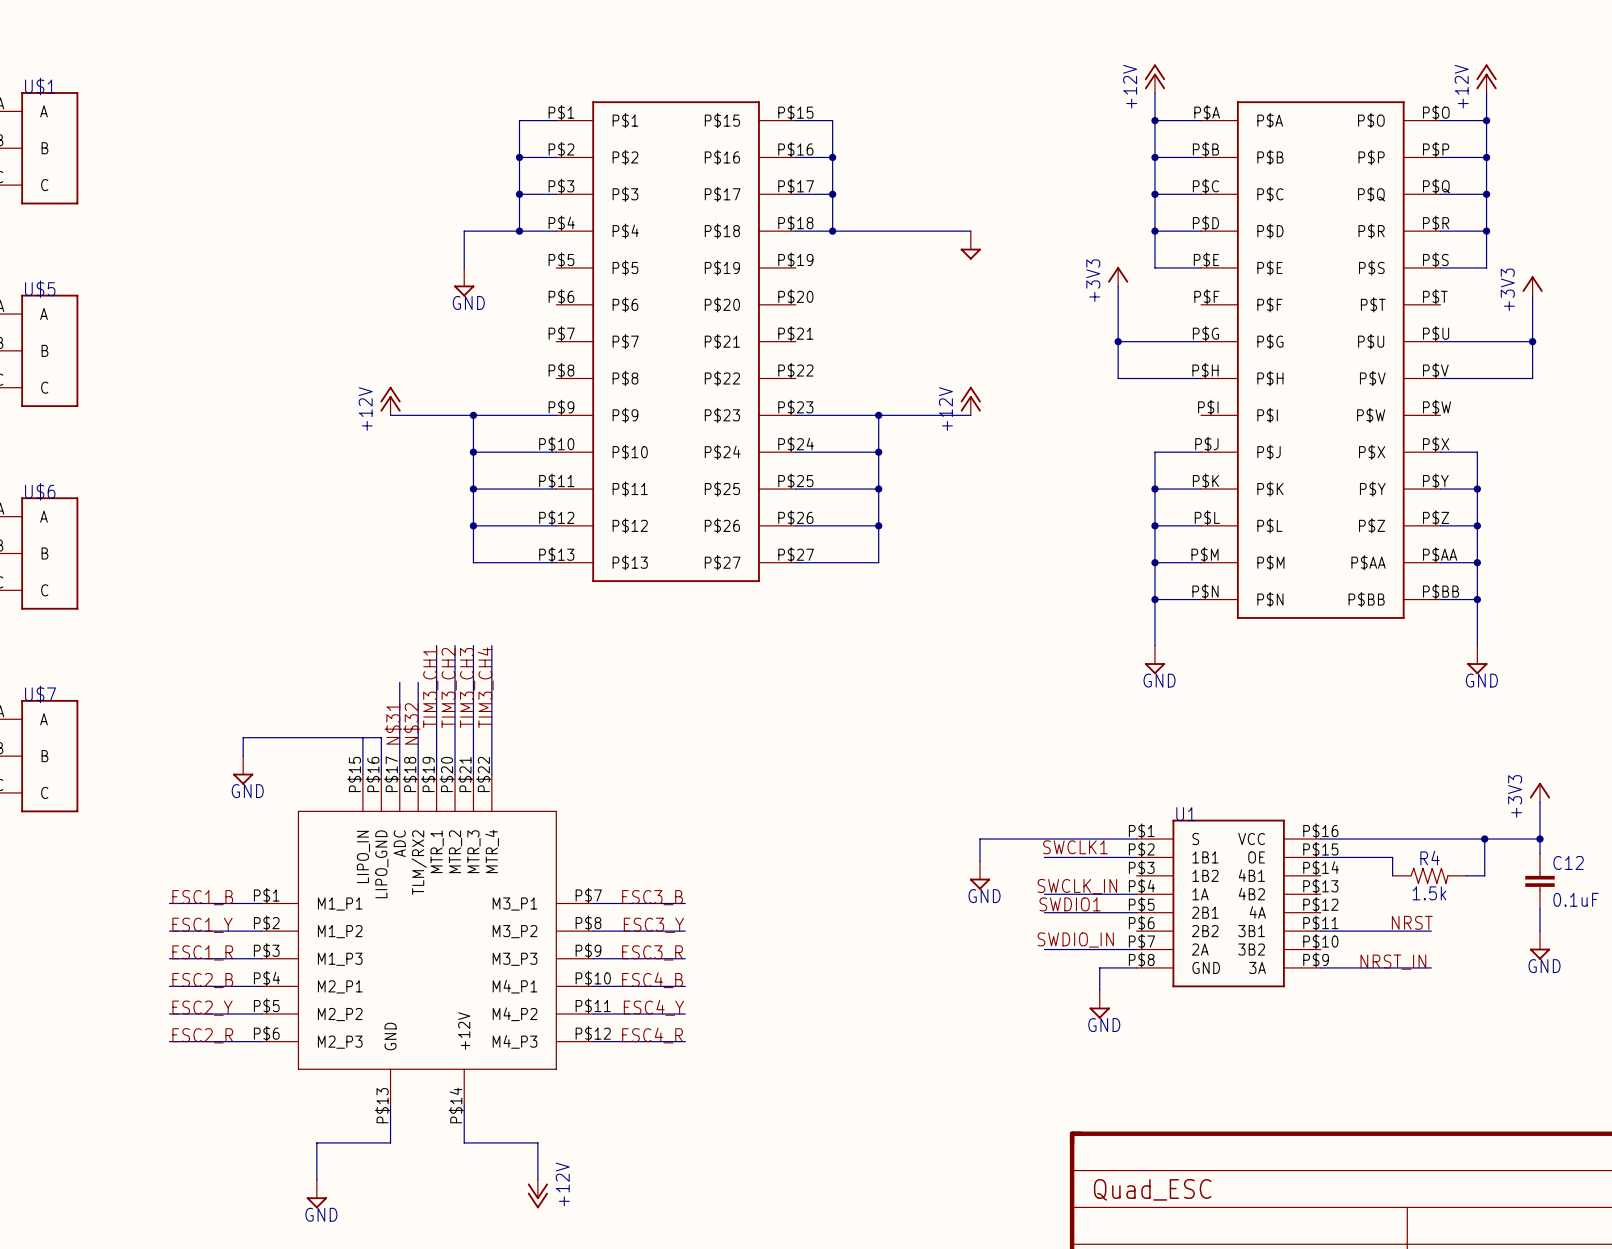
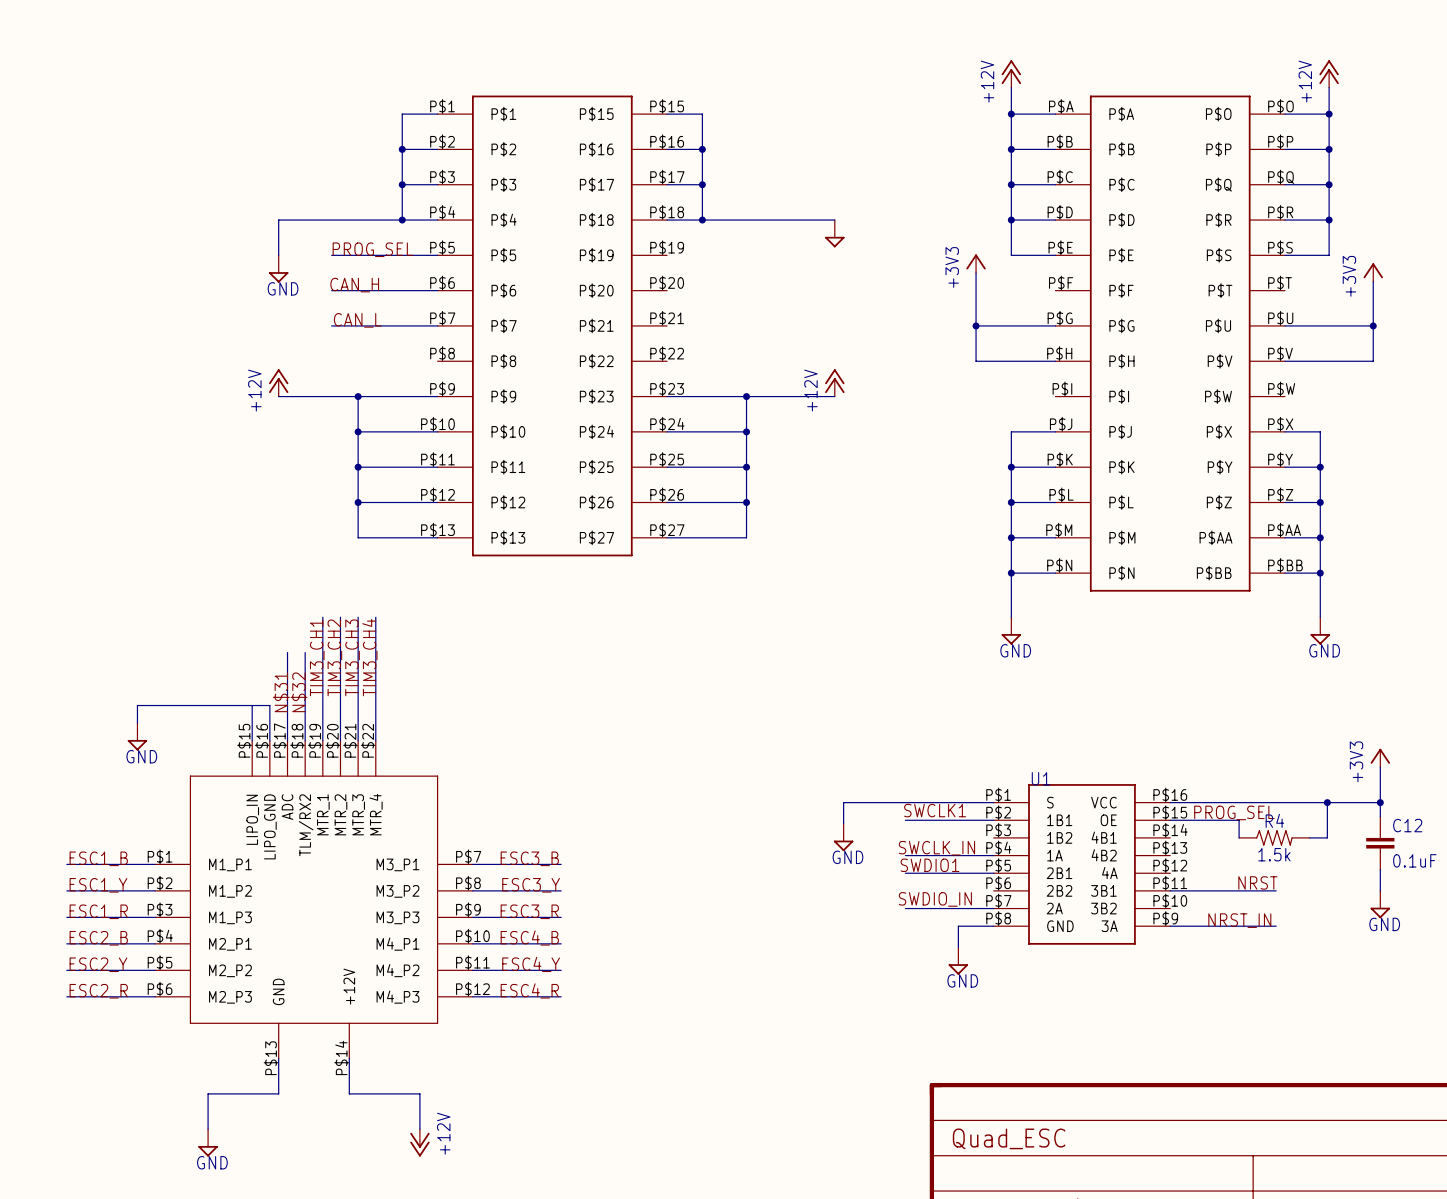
wire: (464, 231) (464, 267) -> (349, 220) (278, 220) (278, 255)
label: none -> PROG_SEL (372, 249)
wire: none -> (331, 255) (437, 255)
power symbol position: GND (464, 282) -> GND (278, 269)
label: none -> CAN_H (354, 285)
wire: none -> (331, 290) (437, 290)
label: none -> CAN_L (357, 320)
wire: none -> (331, 325) (437, 325)
label: none -> PROG_SEL (1234, 812)

